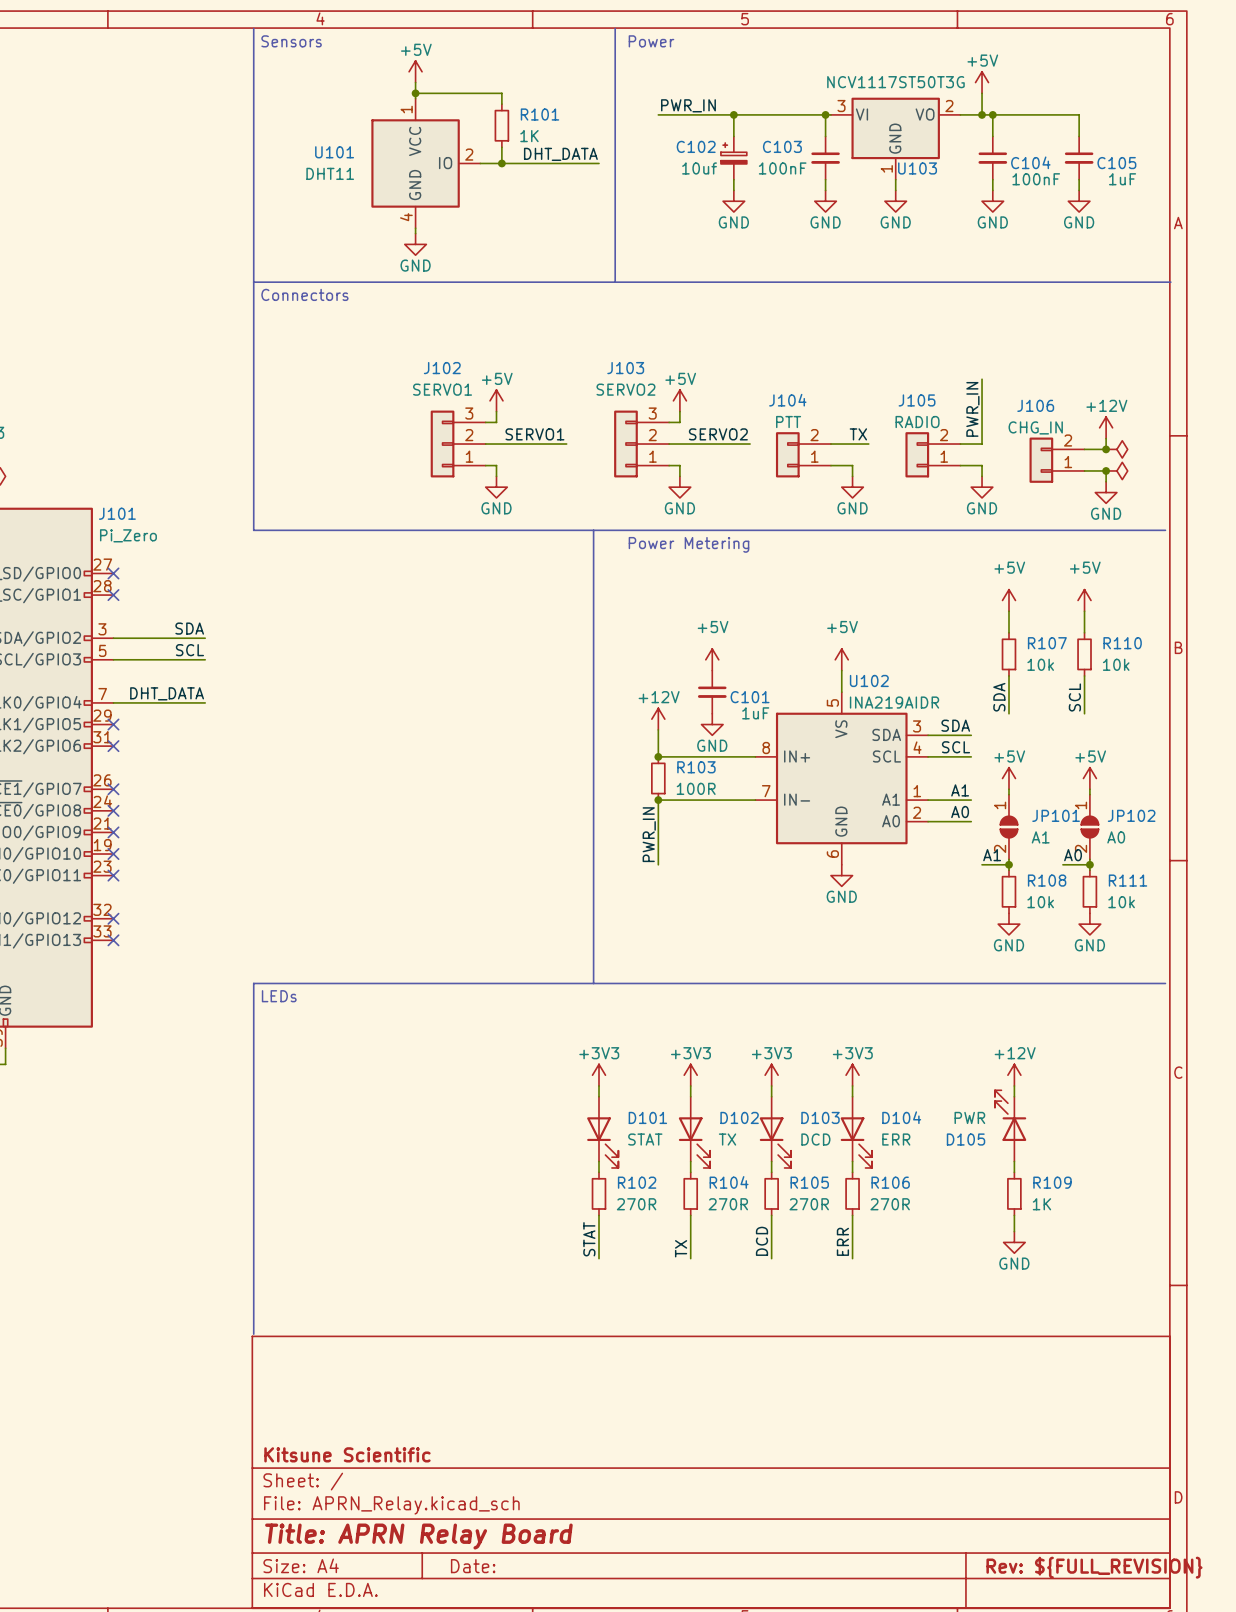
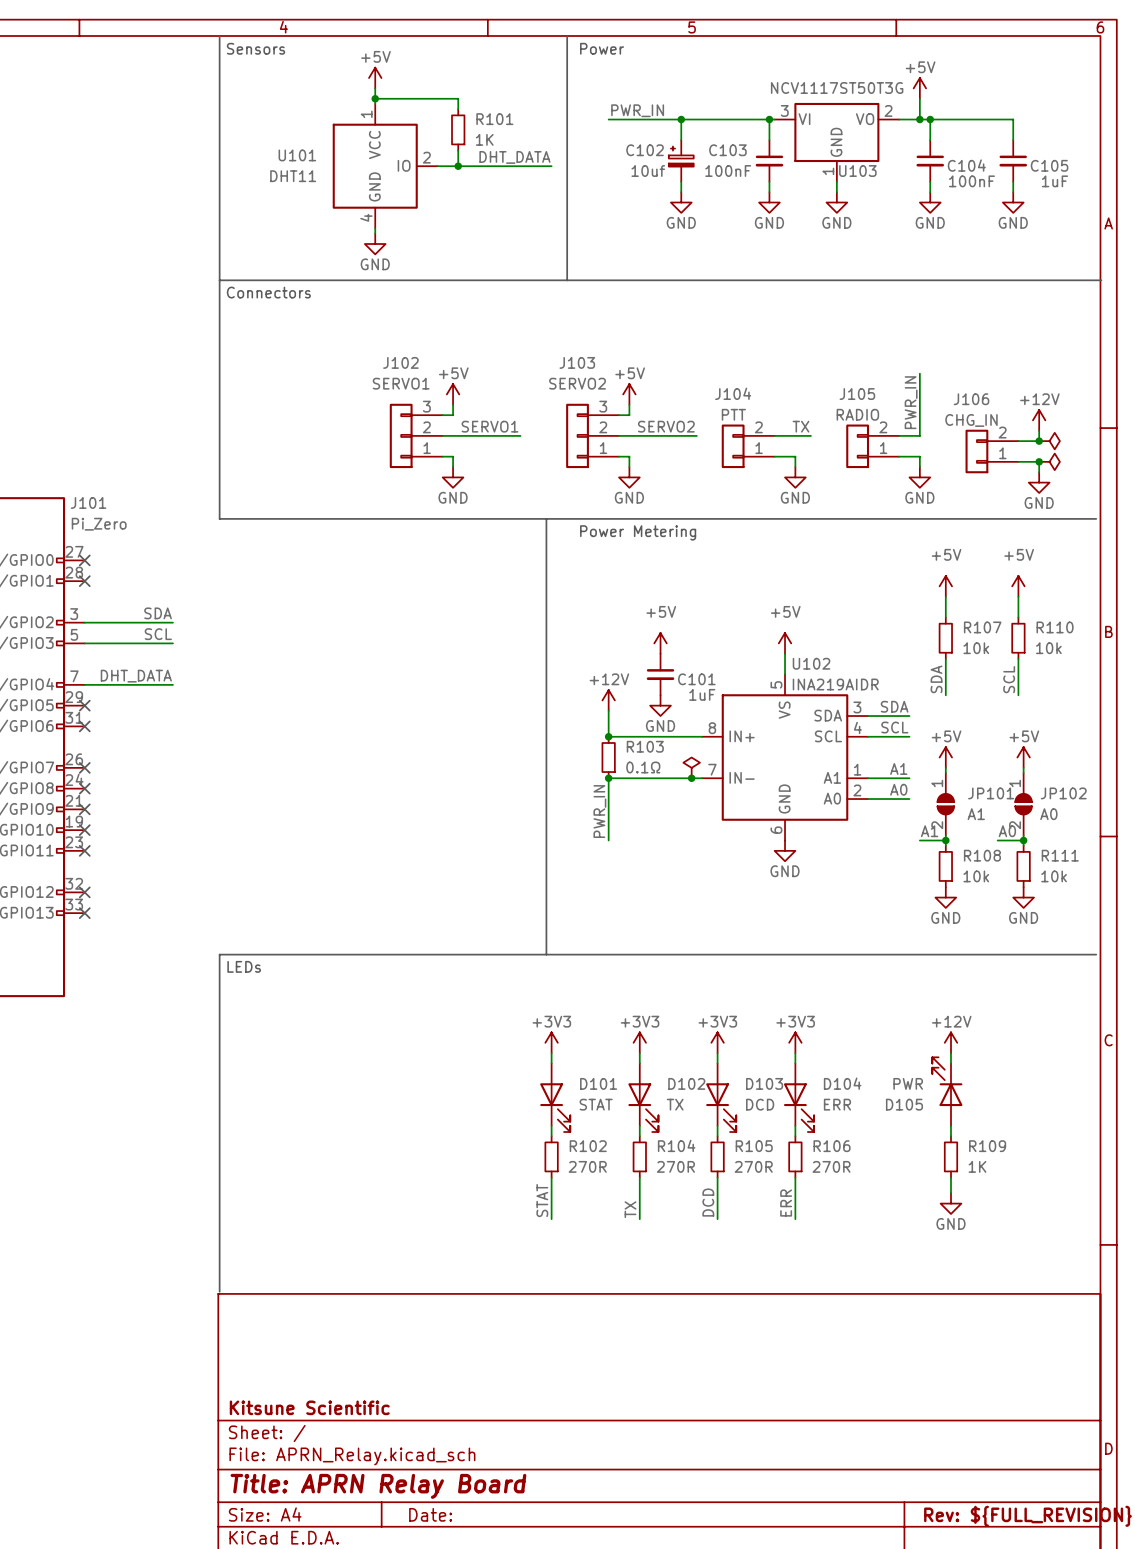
R103 value: 100R (696, 788) -> 0.1Ω (643, 767)
power symbol: none -> (691, 767)
junction: none -> (691, 778)

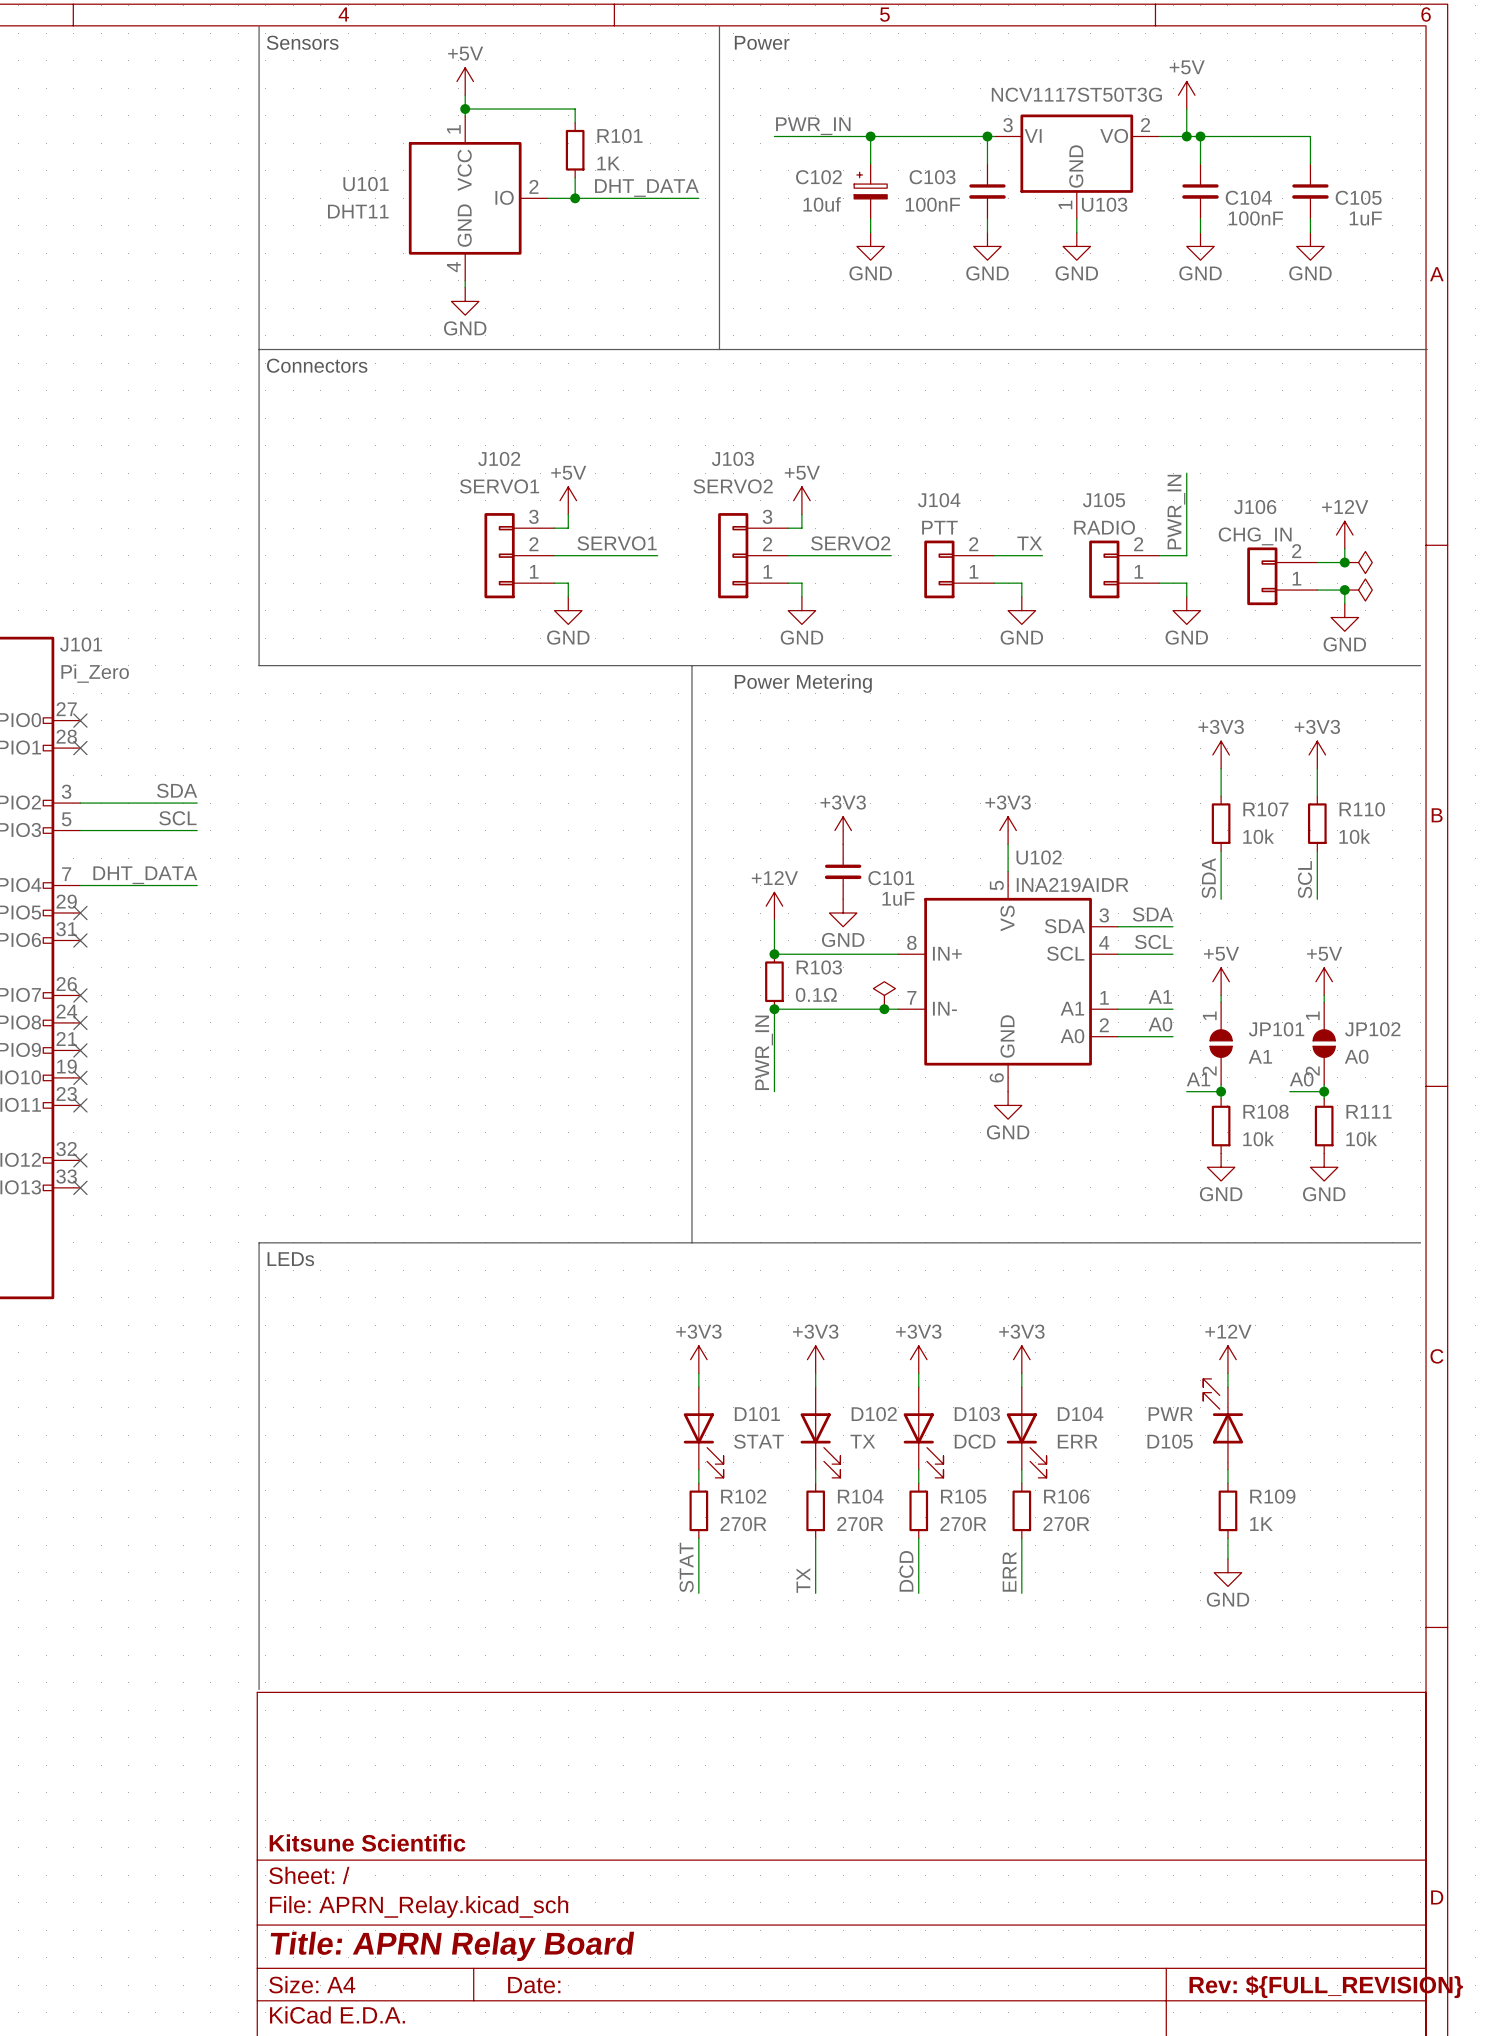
power symbol: +5V (945, 586) -> +3V3 (1221, 754)
power symbol: +5V (1018, 586) -> +3V3 (1317, 754)
power symbol: +5V (660, 643) -> +3V3 (843, 830)
power symbol: +5V (785, 643) -> +3V3 (1008, 830)

